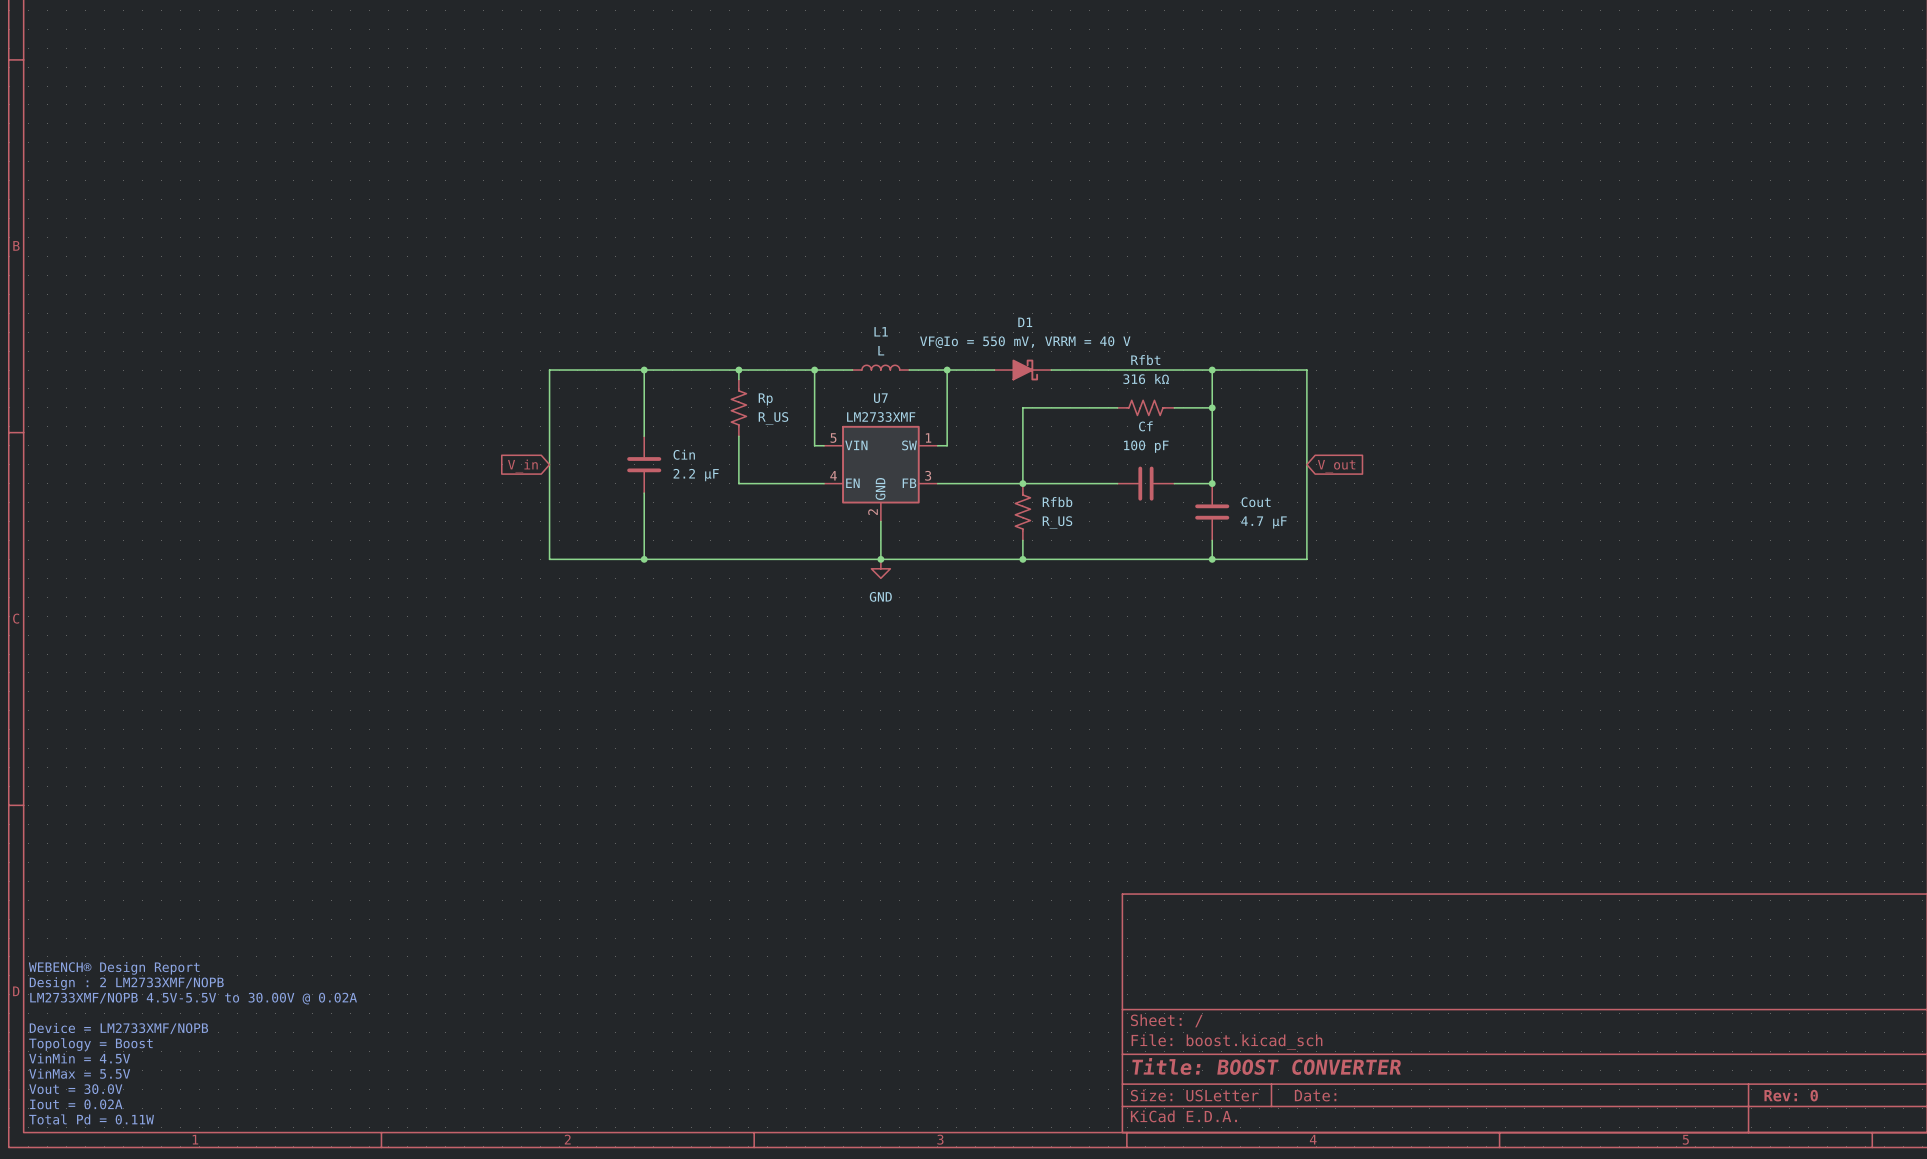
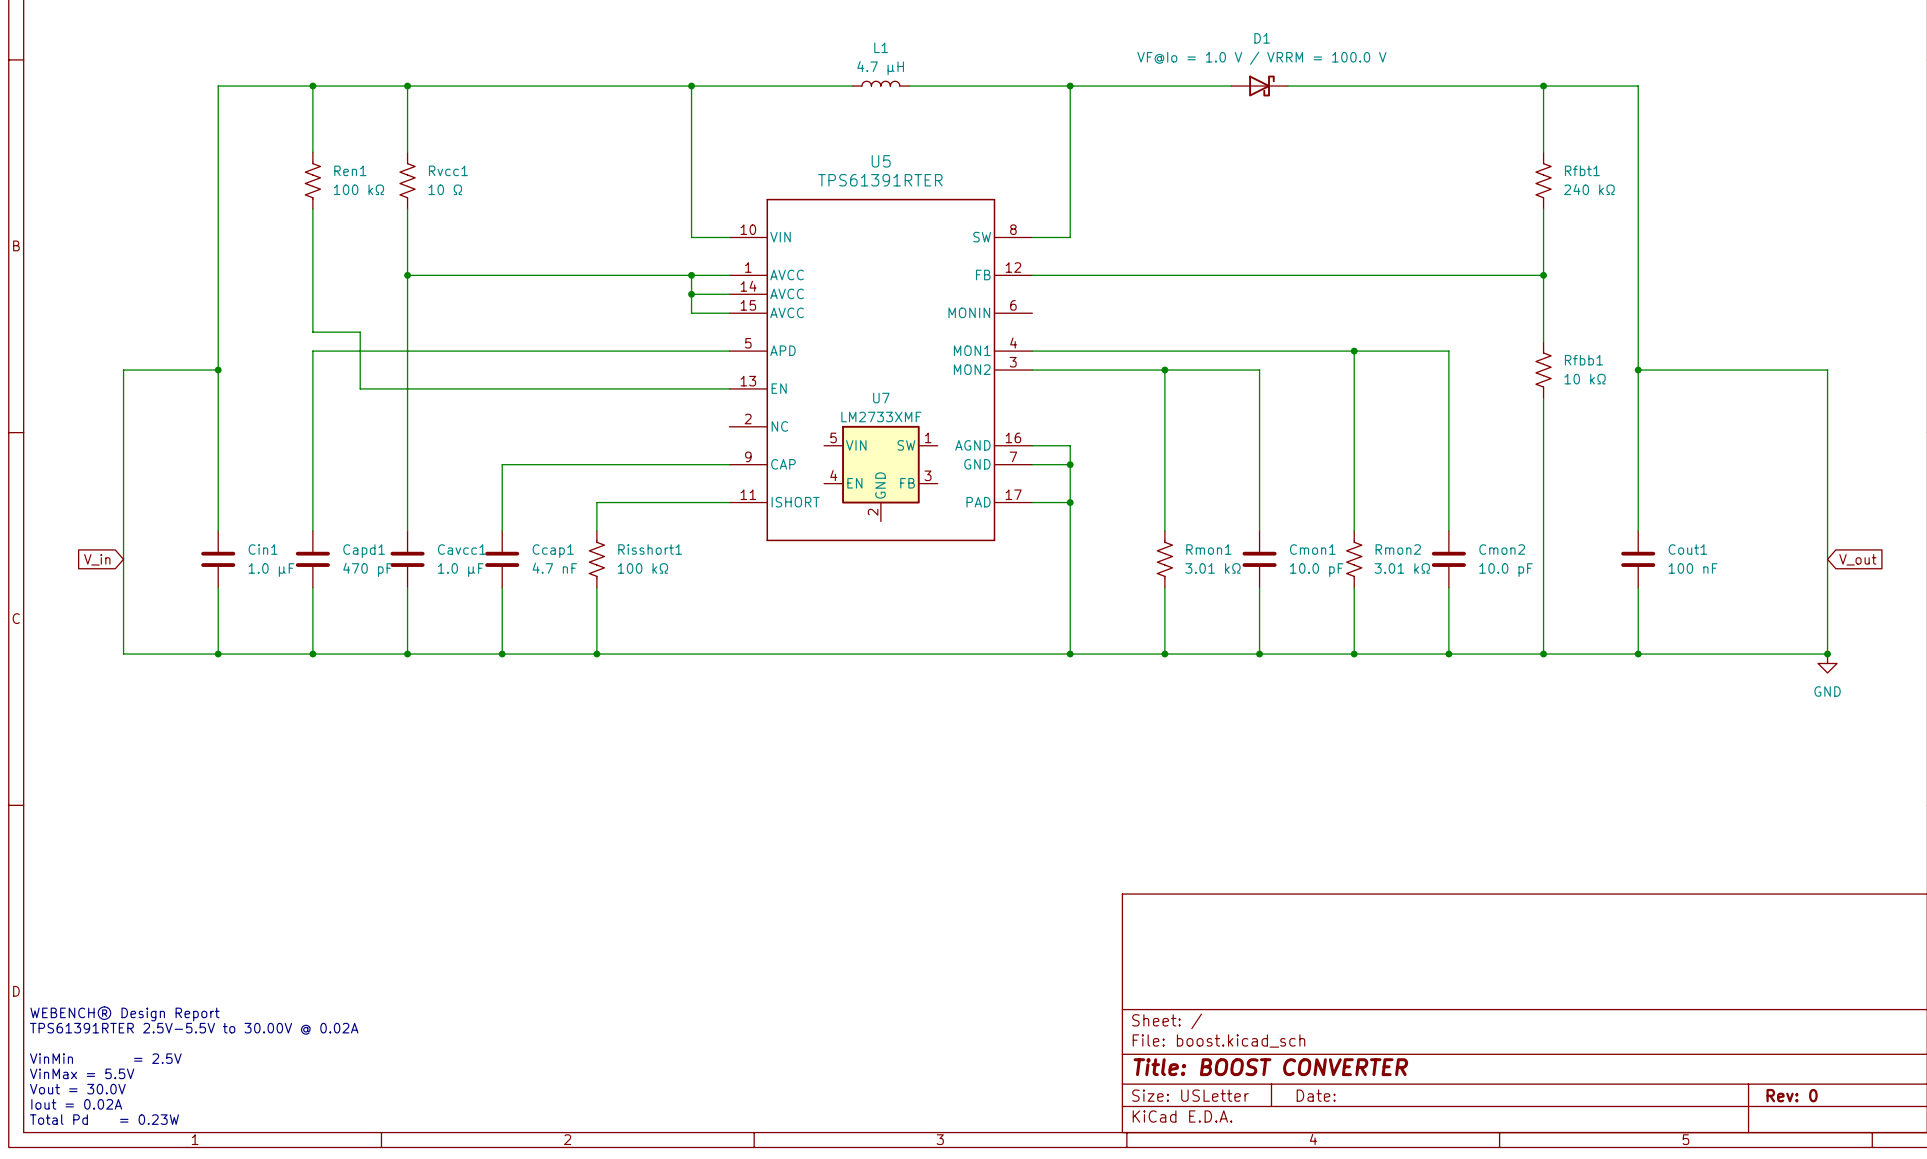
wire: none -> (312, 86) (312, 152)
junction: none -> (312, 86)
wire: none -> (407, 86) (407, 152)
junction: none -> (407, 86)
wire: none -> (691, 86) (691, 237) (729, 237)
junction: none -> (691, 86)
wire: none -> (852, 86) (218, 86) (218, 530)
wire: none -> (909, 86) (1231, 86)
wire: none -> (1070, 86) (1070, 237) (1032, 237)
junction: none -> (1070, 86)
wire: none -> (1287, 86) (1638, 86) (1638, 530)
wire: none -> (1543, 86) (1543, 152)
junction: none -> (1543, 86)
Ren1: none -> 100 kΩ (312, 180)
Rvcc1: none -> 10 Ω (407, 180)
Rfbt1: none -> 240 kΩ (1543, 180)
wire: none -> (312, 209) (312, 332) (360, 332) (360, 388) (729, 388)
wire: none -> (407, 209) (407, 530)
wire: none -> (1543, 209) (1543, 341)
wire: none -> (407, 275) (729, 275)
junction: none -> (407, 275)
wire: none -> (691, 275) (691, 313) (729, 313)
junction: none -> (691, 275)
wire: none -> (1032, 275) (1543, 275)
junction: none -> (1543, 275)
wire: none -> (691, 294) (729, 294)
junction: none -> (691, 294)
D1 value: VF@Io = 550 mV, VRRM = 40 V (1025, 342) -> VF@Io = 1.0 V / VRRM = 100.0 V (1261, 58)
L1 value: L (881, 350) -> 4.7 μH (880, 68)
wire: none -> (729, 351) (312, 351) (312, 530)
wire: none -> (1032, 351) (1448, 351) (1448, 530)
wire: none -> (1354, 351) (1354, 530)
junction: none -> (1354, 351)
D1 symbol: [994, 359, 1052, 381] -> [1231, 75, 1288, 97]
L1 position: (880, 367) -> (880, 83)
wire: none -> (218, 370) (123, 370) (123, 654) (1827, 654) (1827, 370) (1638, 370)
junction: none -> (218, 370)
wire: (644, 370) (644, 436) -> none
junction: (644, 370) -> none
wire: (738, 370) (738, 379) -> none
junction: (738, 370) -> none
wire: (814, 370) (814, 445) (824, 445) -> none
junction: (814, 370) -> none
wire: (852, 370) (549, 370) (549, 559) (1306, 559) (1306, 370) (1259, 370) -> (1259, 530) (1259, 370)
U5: none -> TPS61391RTER (880, 370)
wire: (909, 370) (994, 370) -> none
wire: (947, 370) (947, 445) (937, 445) -> none
junction: (947, 370) -> none
wire: none -> (1164, 370) (1164, 530)
junction: none -> (1164, 370)
wire: (1212, 370) (1212, 483) (1174, 483) -> none
junction: (1212, 370) -> none
Rfbb1: none -> 10 kΩ (1543, 370)
junction: none -> (1638, 370)
wire: none -> (1543, 398) (1543, 654)
Rp: R_US (738, 407) -> none
wire: (1117, 407) (1022, 407) (1022, 483) -> none
Rfbt: 316 kΩ (1145, 407) -> none
wire: (1174, 407) (1212, 407) -> (1032, 502) (1070, 502)
junction: (1212, 407) -> none
wire: (738, 436) (738, 483) (824, 483) -> none
wire: none -> (1032, 445) (1070, 445) (1070, 654)
Cin: 2.2 μF (644, 464) -> none
wire: none -> (729, 464) (502, 464) (502, 530)
wire: none -> (1032, 464) (1070, 464)
junction: none -> (1070, 464)
global label: V_in (522, 466) -> none
global label: V_out (1336, 466) -> none
wire: (937, 483) (1117, 483) -> none
junction: (1022, 483) -> none
Cf: 100 pF (1145, 483) -> none
junction: (1212, 483) -> none
wire: (644, 493) (644, 559) -> (502, 587) (502, 654)
wire: none -> (729, 502) (596, 502) (596, 530)
junction: none -> (1070, 502)
Rfbb: R_US (1022, 512) -> none
Cout: 4.7 μF (1212, 512) -> none
wire: (880, 521) (880, 559) -> none
wire: (1022, 540) (1022, 559) -> none
wire: (1212, 540) (1212, 559) -> none
Cin1: none -> 1.0 μF (218, 559)
Capd1: none -> 470 pF (312, 559)
Cavcc1: none -> 1.0 μF (407, 559)
Ccap1: none -> 4.7 nF (502, 559)
Risshort1: none -> 100 kΩ (596, 559)
junction: (644, 559) -> none
junction: (880, 559) -> none
junction: (1022, 559) -> none
Rmon1: none -> 3.01 kΩ (1164, 559)
junction: (1212, 559) -> none
Cmon1: none -> 10.0 pF (1259, 559)
Rmon2: none -> 3.01 kΩ (1354, 559)
Cmon2: none -> 10.0 pF (1448, 559)
Cout1: none -> 100 nF (1638, 559)
global label: none -> V_in (97, 559)
global label: none -> V_out (1857, 559)
power symbol: GND (880, 568) -> none
wire: none -> (218, 587) (218, 654)
wire: none -> (312, 587) (312, 654)
wire: none -> (407, 587) (407, 654)
wire: none -> (596, 587) (596, 654)
wire: none -> (1164, 587) (1164, 654)
wire: none -> (1259, 587) (1259, 654)
wire: none -> (1354, 587) (1354, 654)
wire: none -> (1448, 587) (1448, 654)
wire: none -> (1638, 587) (1638, 654)
junction: none -> (218, 654)
junction: none -> (312, 654)
junction: none -> (407, 654)
junction: none -> (502, 654)
junction: none -> (596, 654)
junction: none -> (1070, 654)
junction: none -> (1164, 654)
junction: none -> (1259, 654)
junction: none -> (1354, 654)
junction: none -> (1448, 654)
junction: none -> (1543, 654)
junction: none -> (1638, 654)
junction: none -> (1827, 654)
power symbol: none -> GND (1827, 663)
text position: WEBENCH® Design Report (114, 968) -> WEBENCH® Design Report (124, 1013)
text: Design : 2 LM2733XMF/NOPB (126, 983) -> none
text: LM2733XMF/NOPB 4.5V-5.5V to 30.00V @ 0.02A (193, 998) -> none
text: Device = LM2733XMF/NOPB (118, 1028) -> TPS61391RTER 2.5V-5.5V to 30.00V @ 0.02A (194, 1028)
text: Topology = Boost (90, 1044) -> none
text: VinMin = 4.5V (79, 1058) -> VinMin = 2.5V (105, 1058)
text: Total Pd = 0.11W (91, 1119) -> Total Pd = 0.23W (104, 1119)

